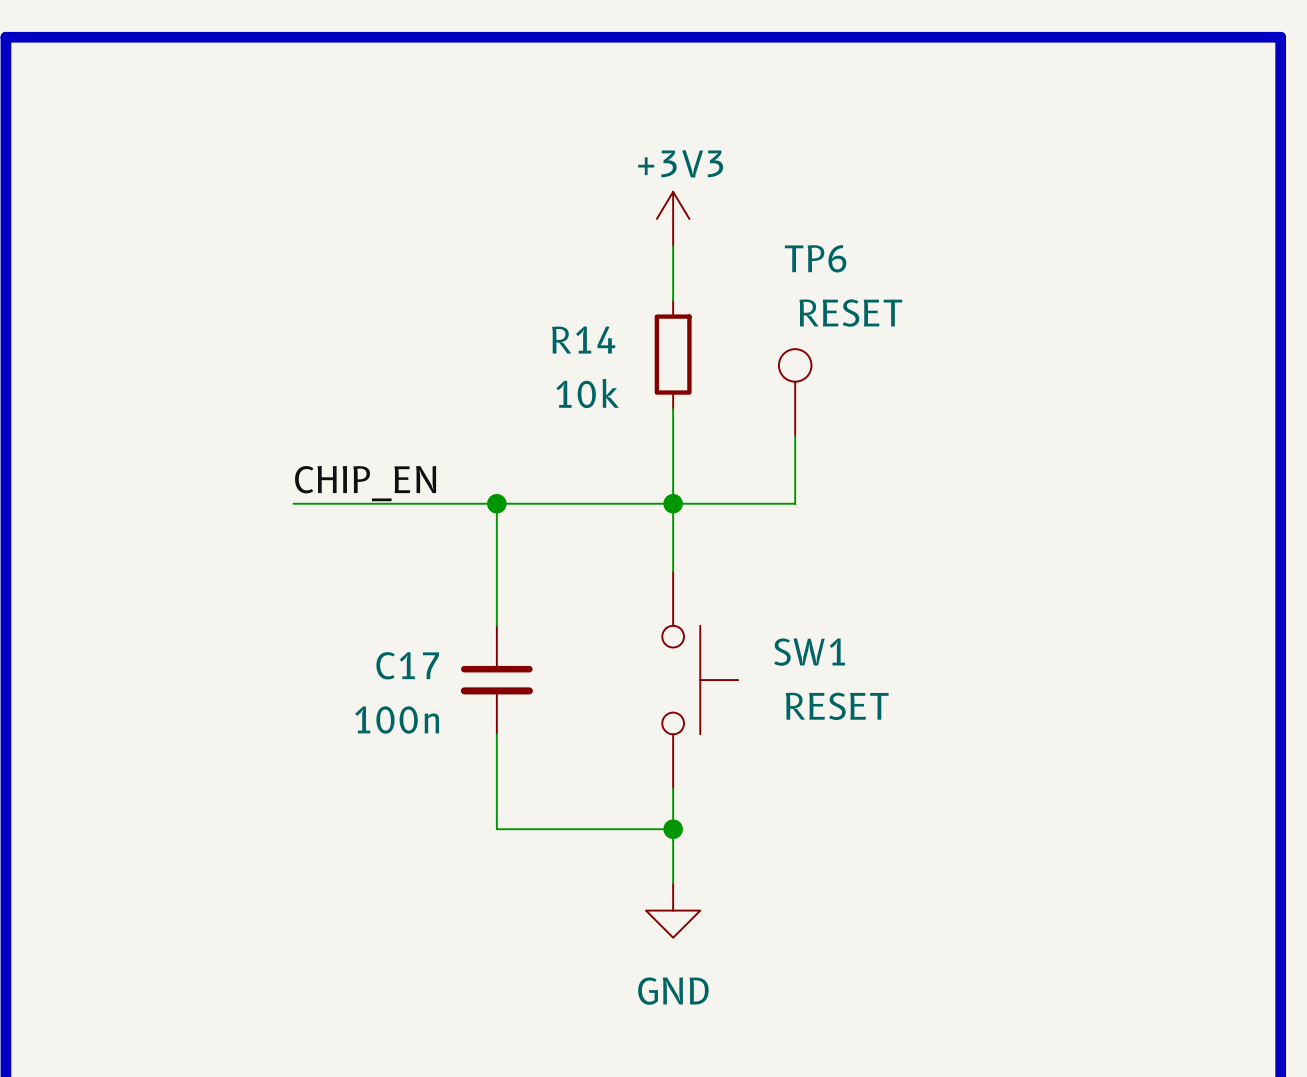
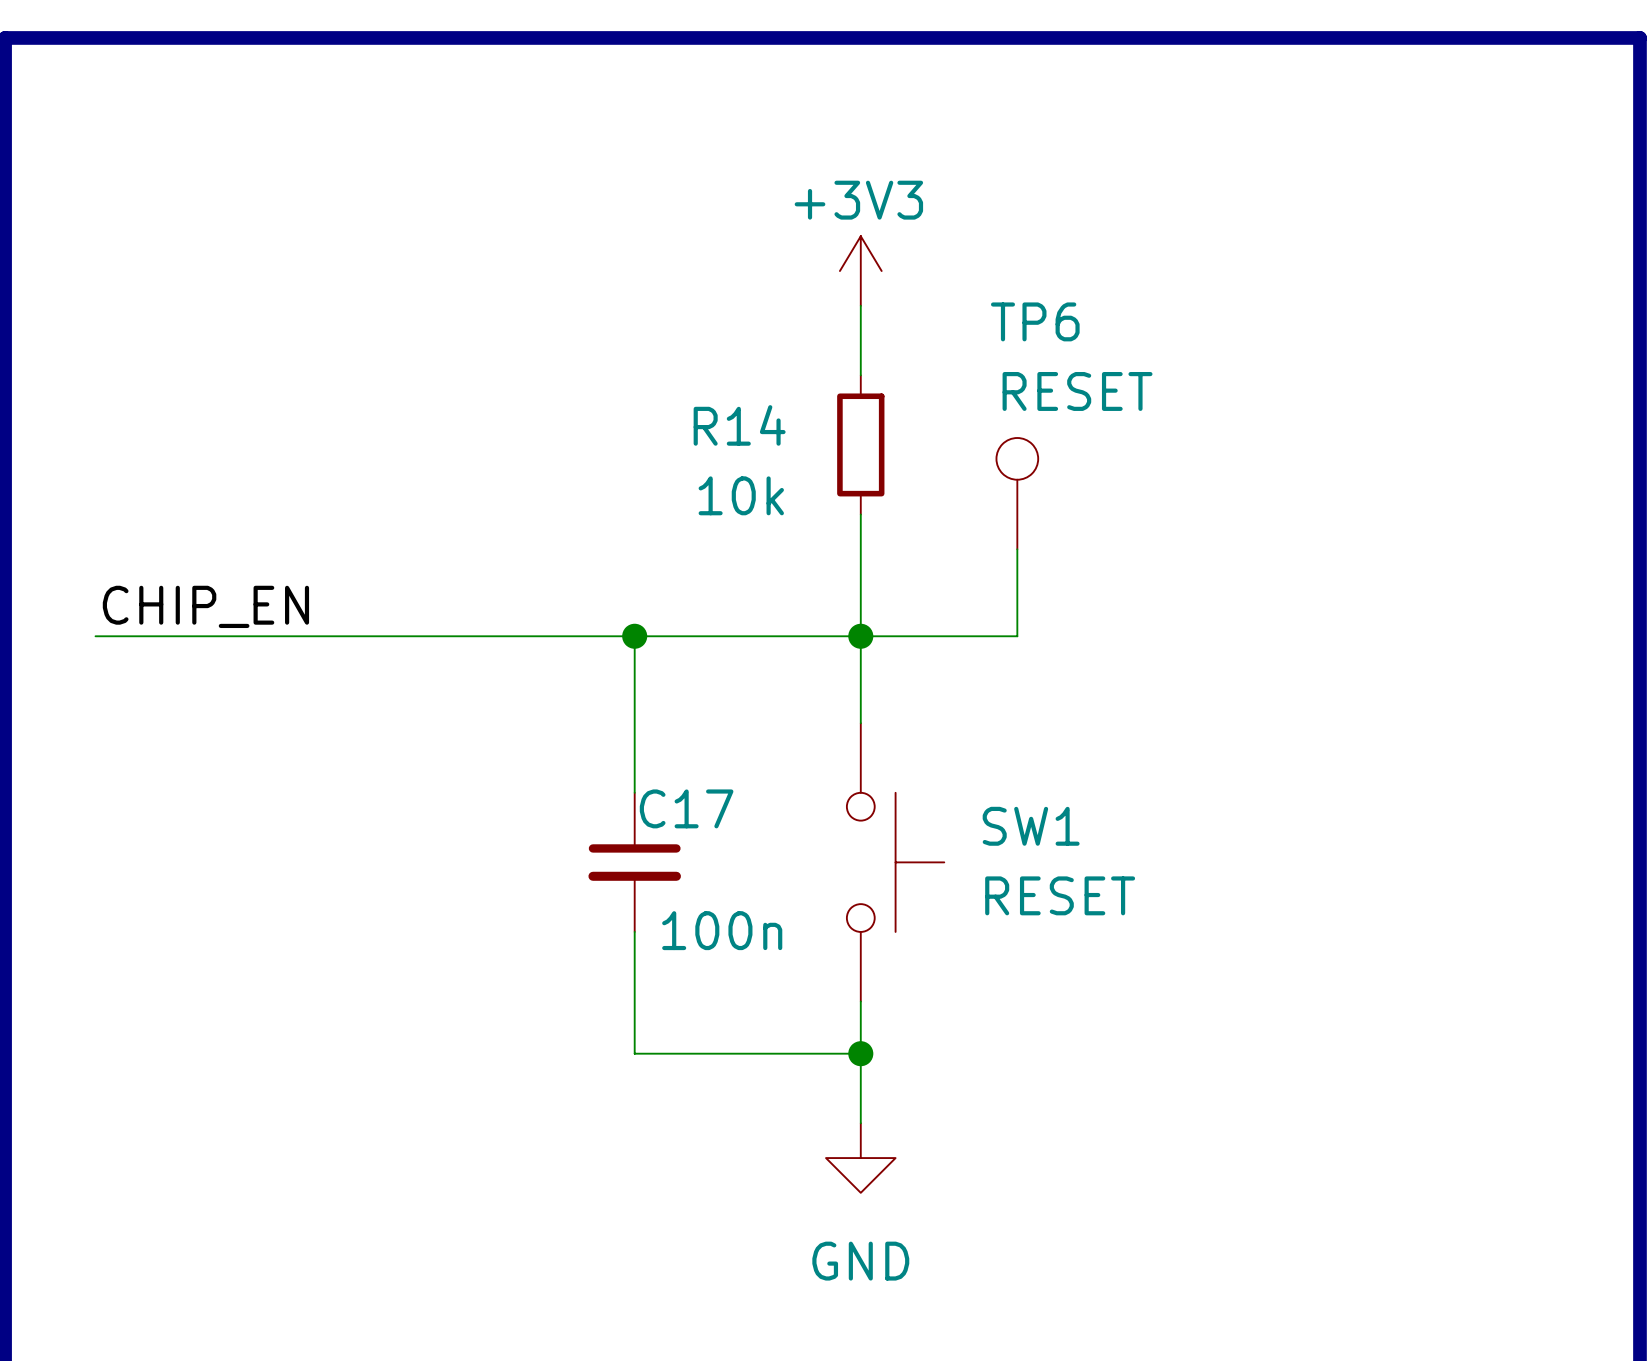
label position: CHIP_EN (365, 483) -> CHIP_EN (205, 606)
wire: none -> (95, 636) (373, 636)
C17 name position: C17 (407, 665) -> C17 (686, 808)
C17 value position: 100n (397, 720) -> 100n (722, 930)

